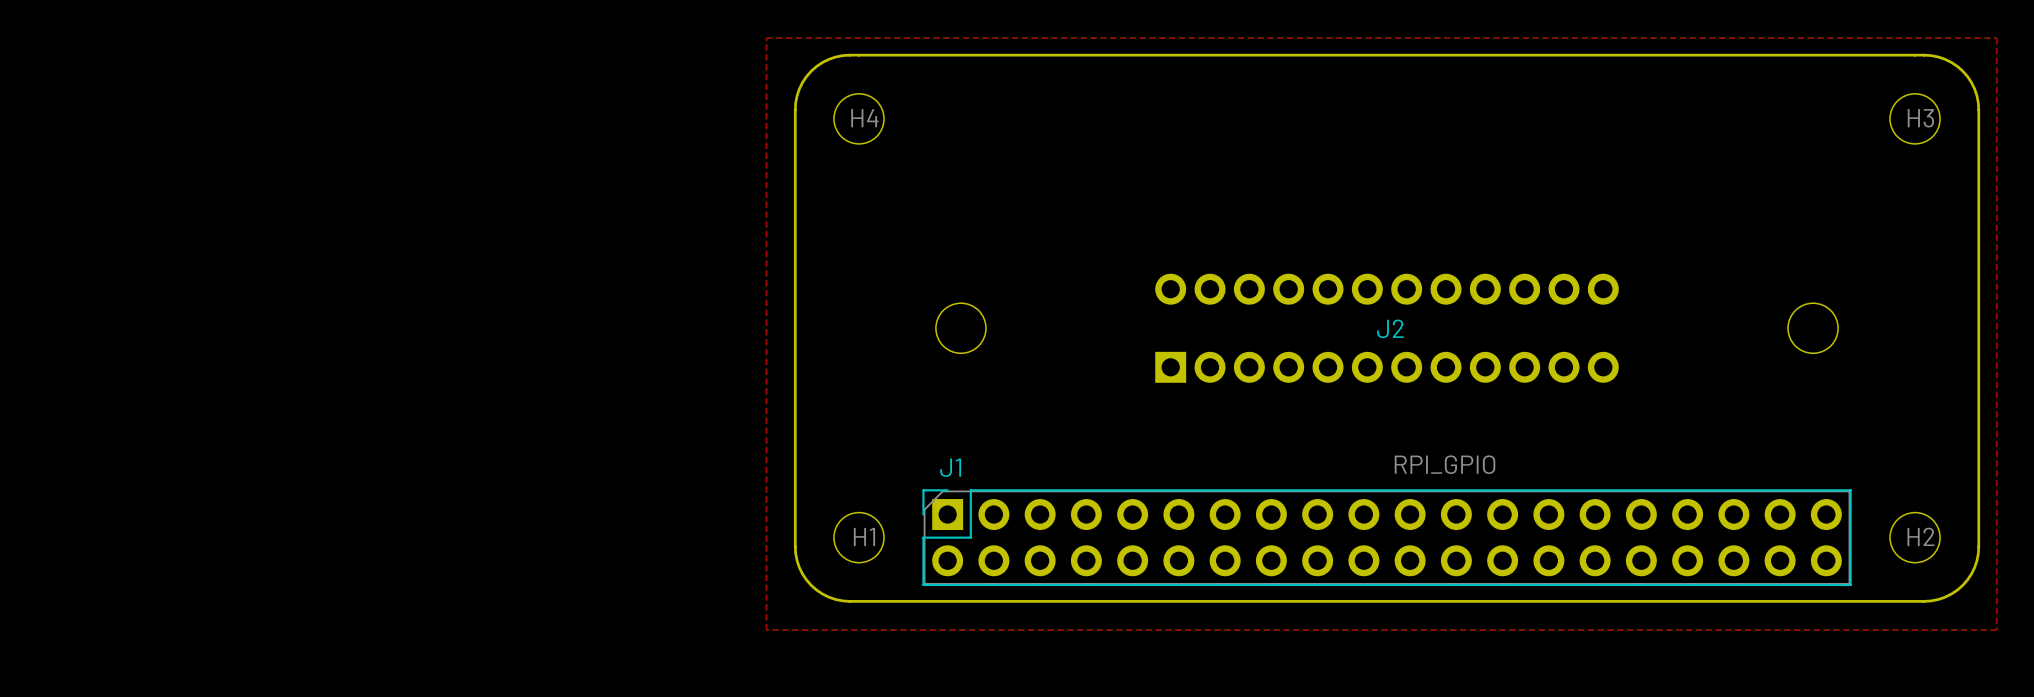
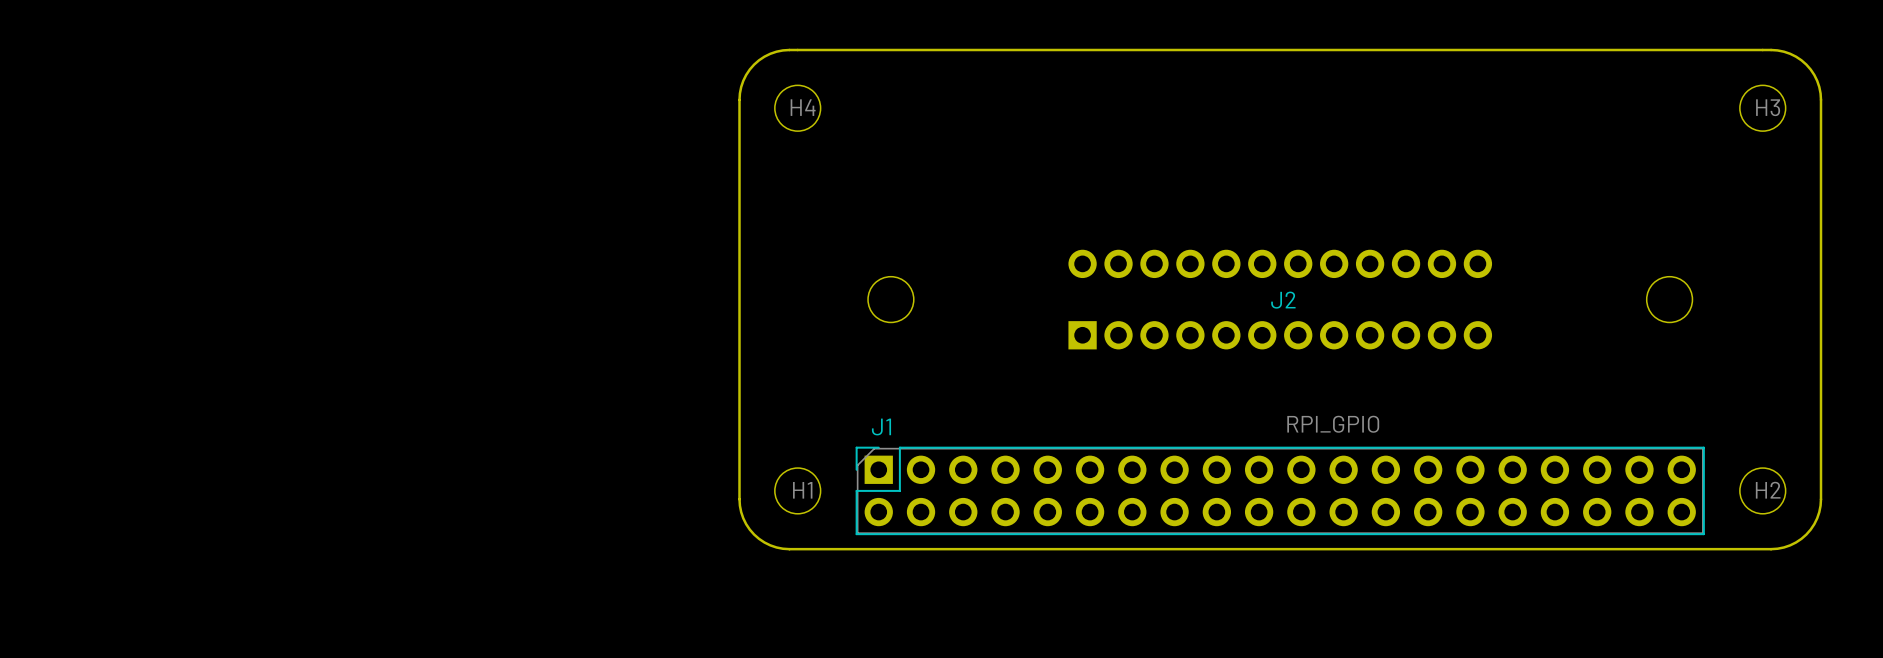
top zone outline: (766, 38) (766, 630) (1996, 630) (1996, 38) (766, 38) -> none

